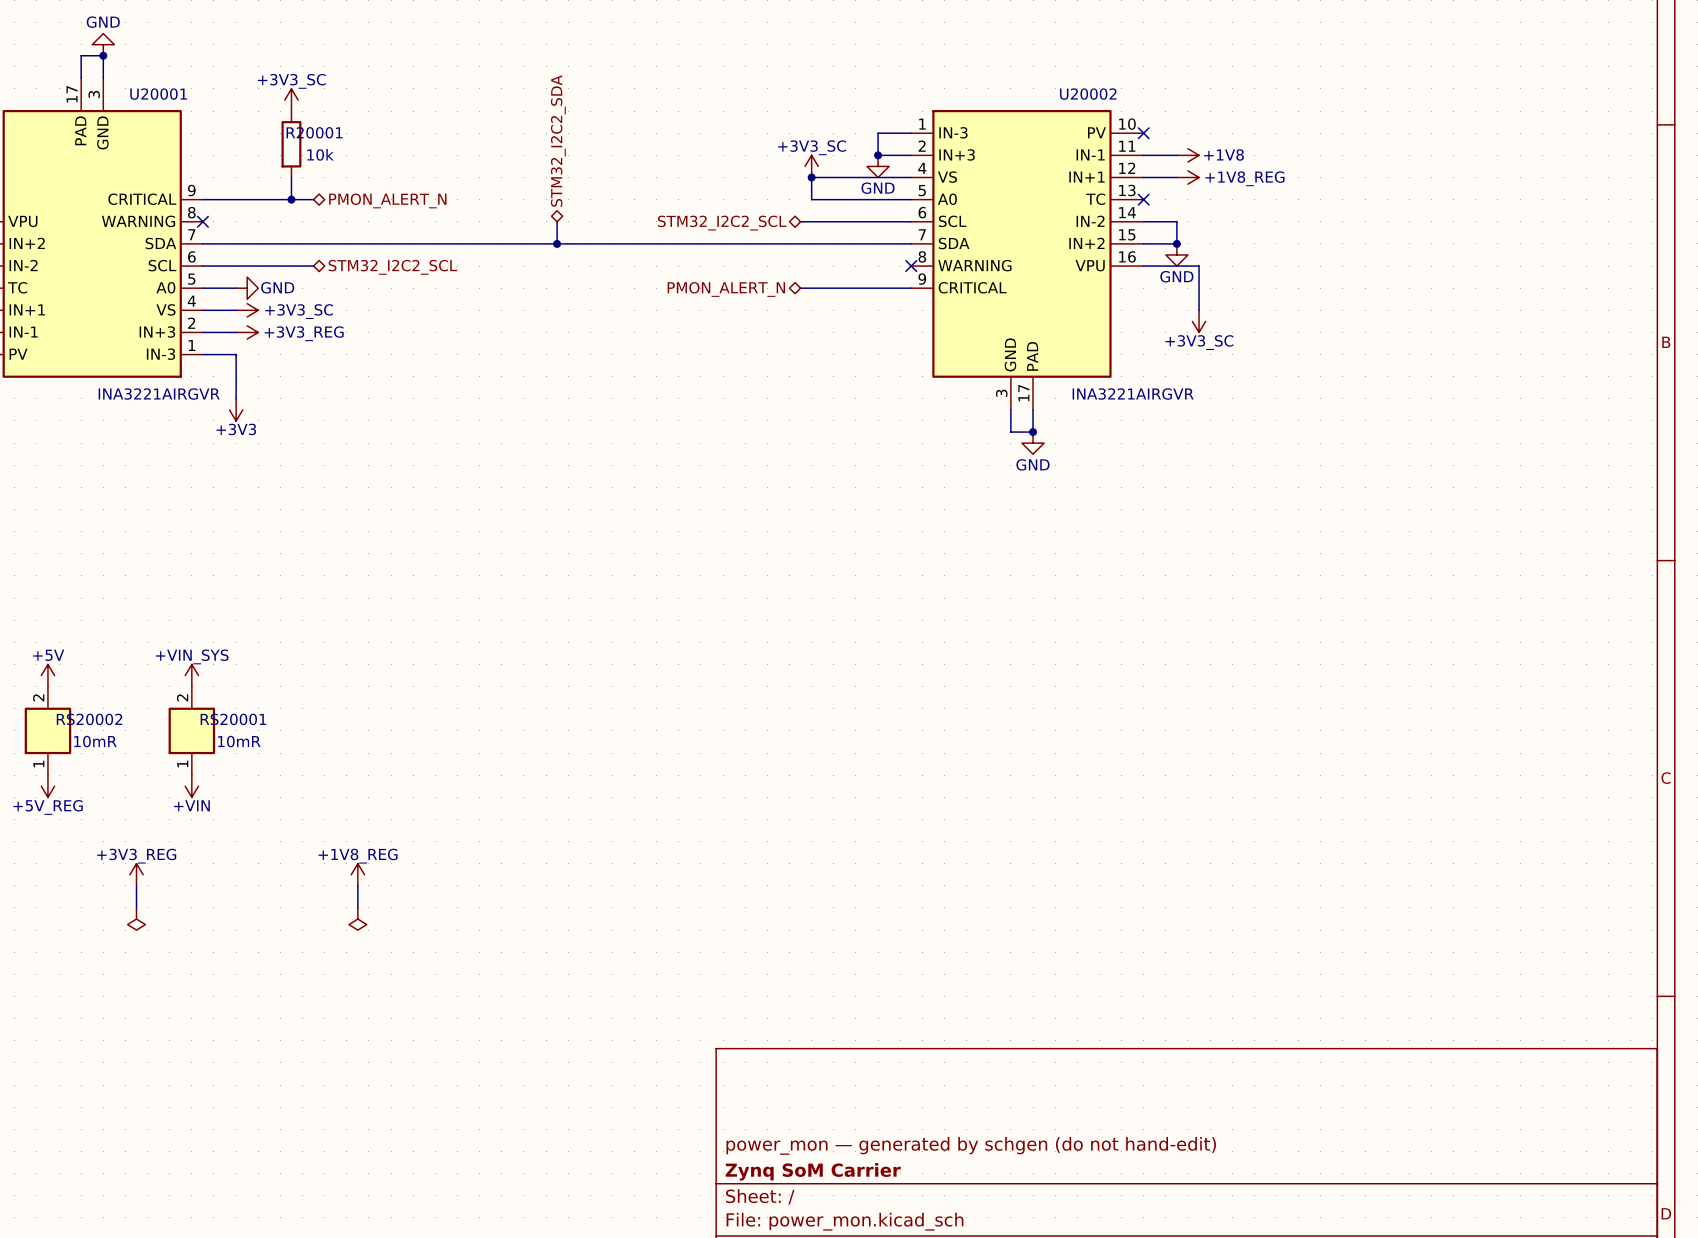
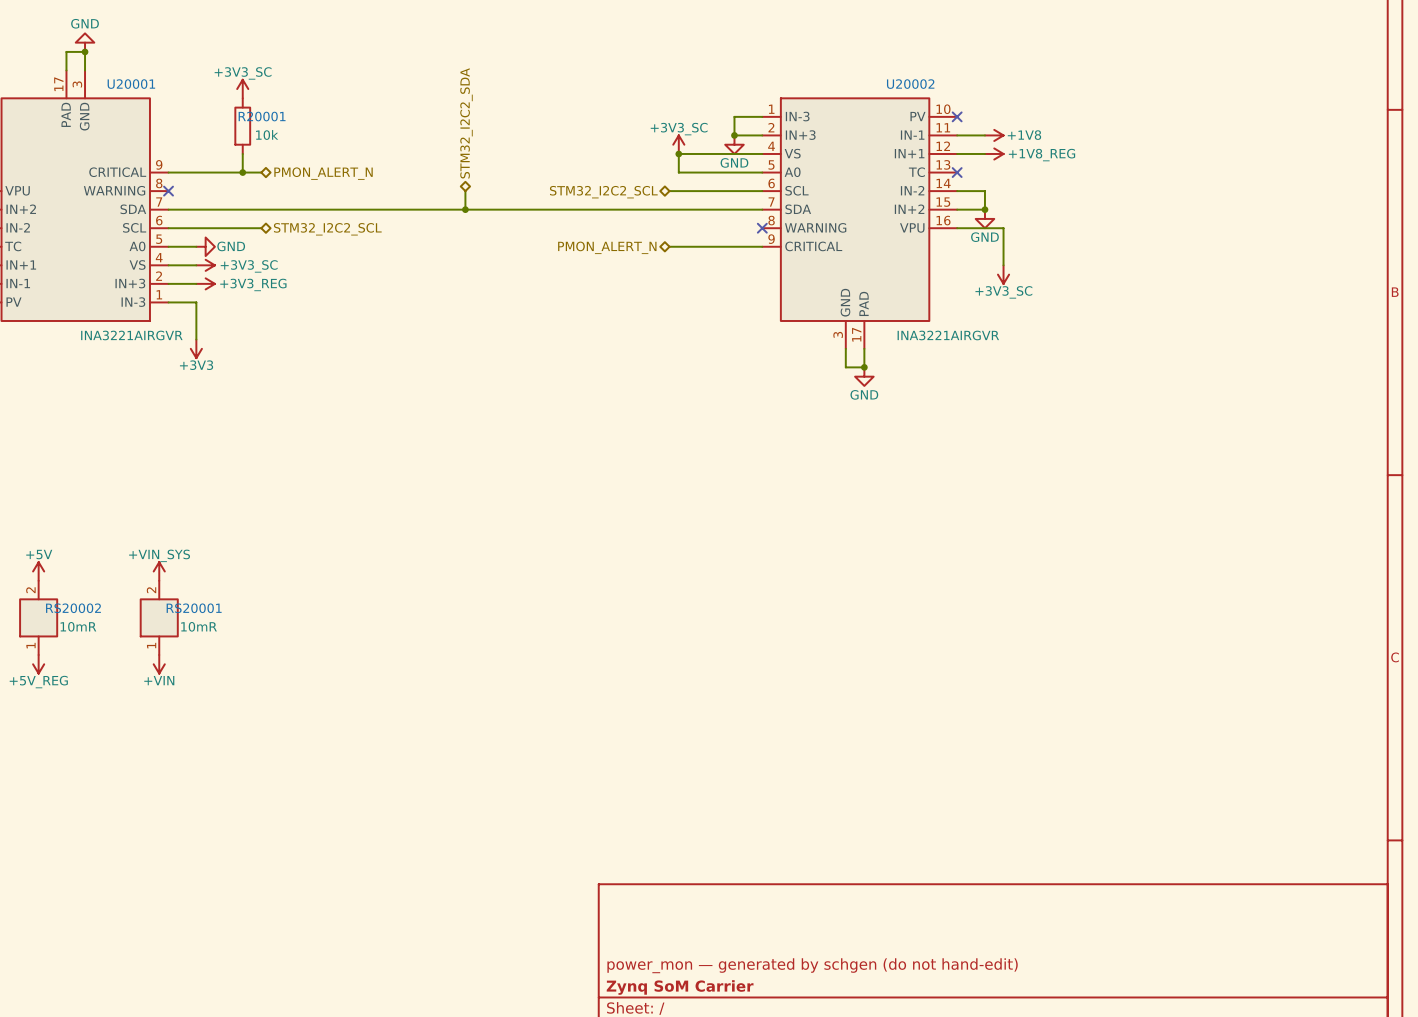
power symbol: +3V3_REG (136, 874) -> none
power symbol: +1V8_REG (357, 874) -> none
wire: (136, 885) (136, 907) -> none
wire: (357, 885) (357, 907) -> none
power symbol: (136, 919) -> none
power symbol: (357, 919) -> none

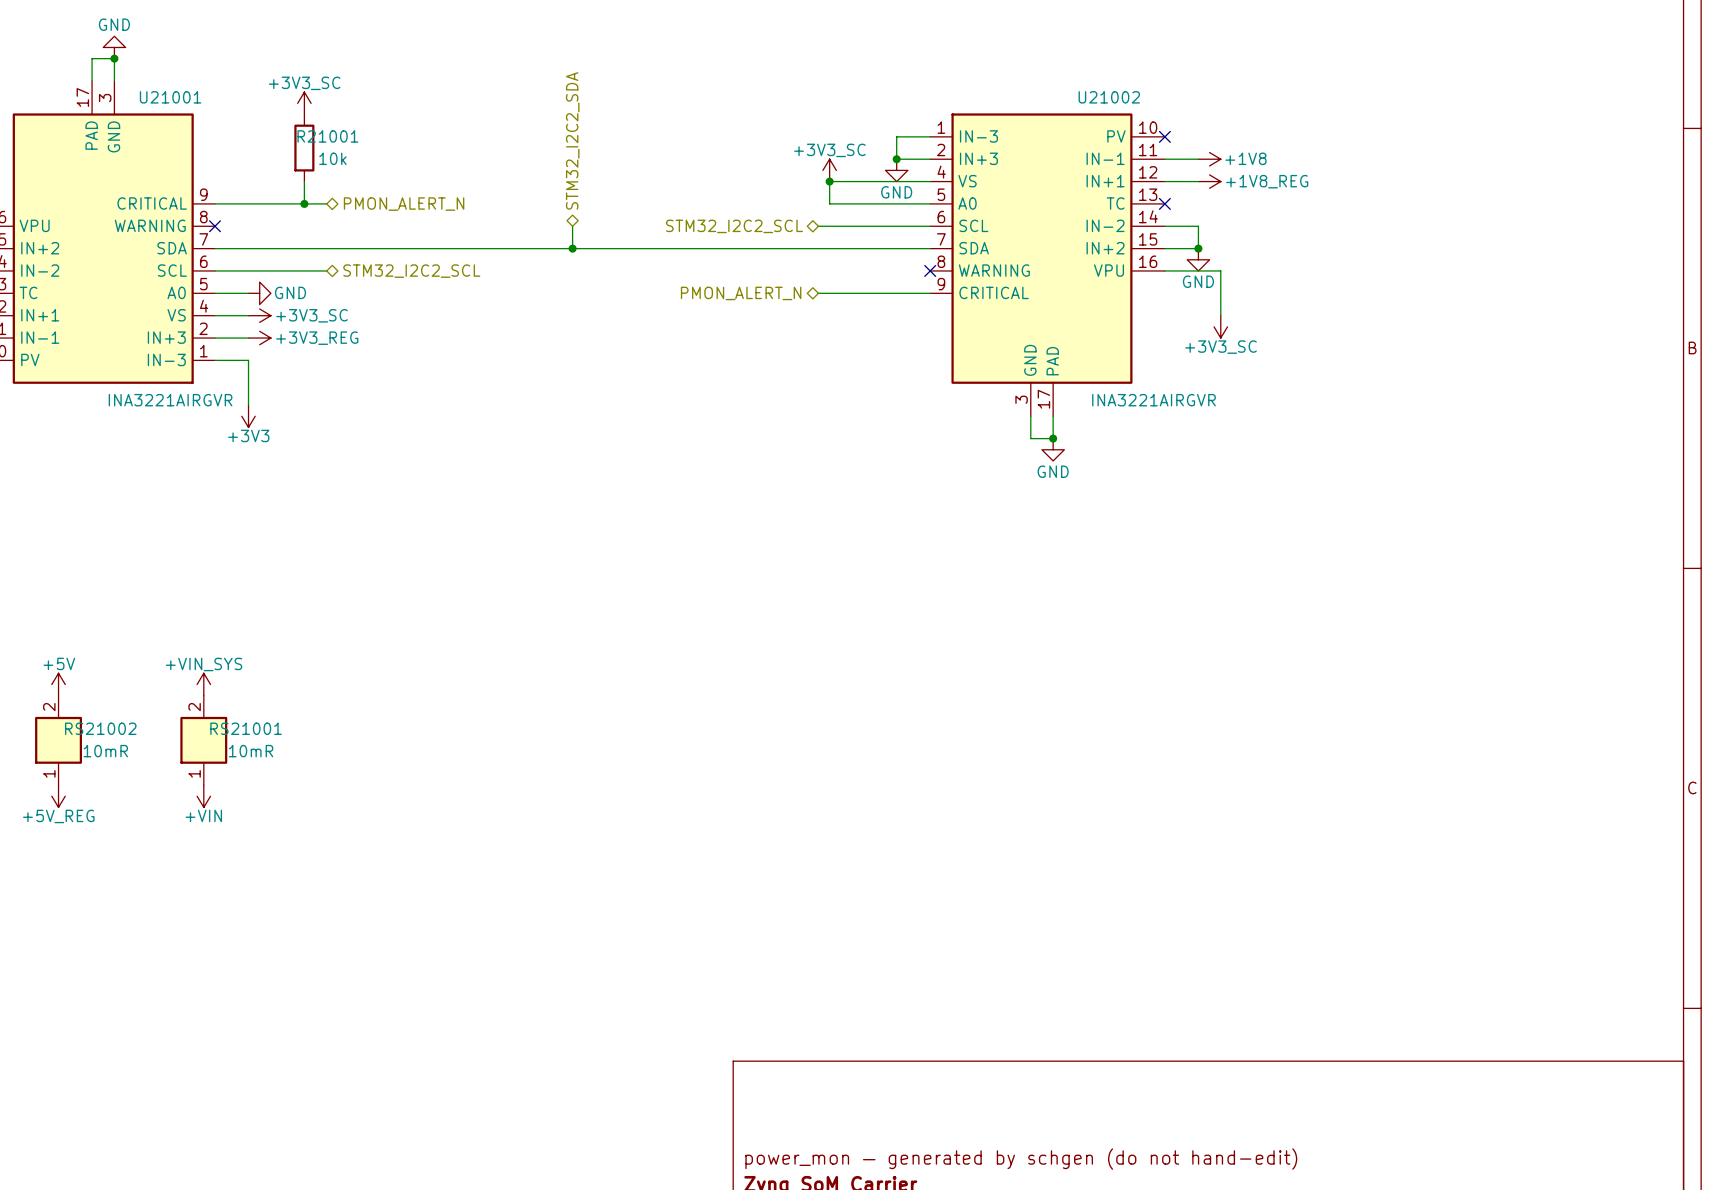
U20001 name: U20001 (131, 84) -> U21001 (170, 97)
U20002 name: U20002 (910, 84) -> U21002 (1109, 97)
R20001 name: R20001 (262, 116) -> R21001 (327, 136)
RS20002 name: RS20002 (73, 608) -> RS21002 (100, 728)
RS20001 name: RS20001 (194, 608) -> RS21001 (246, 728)

